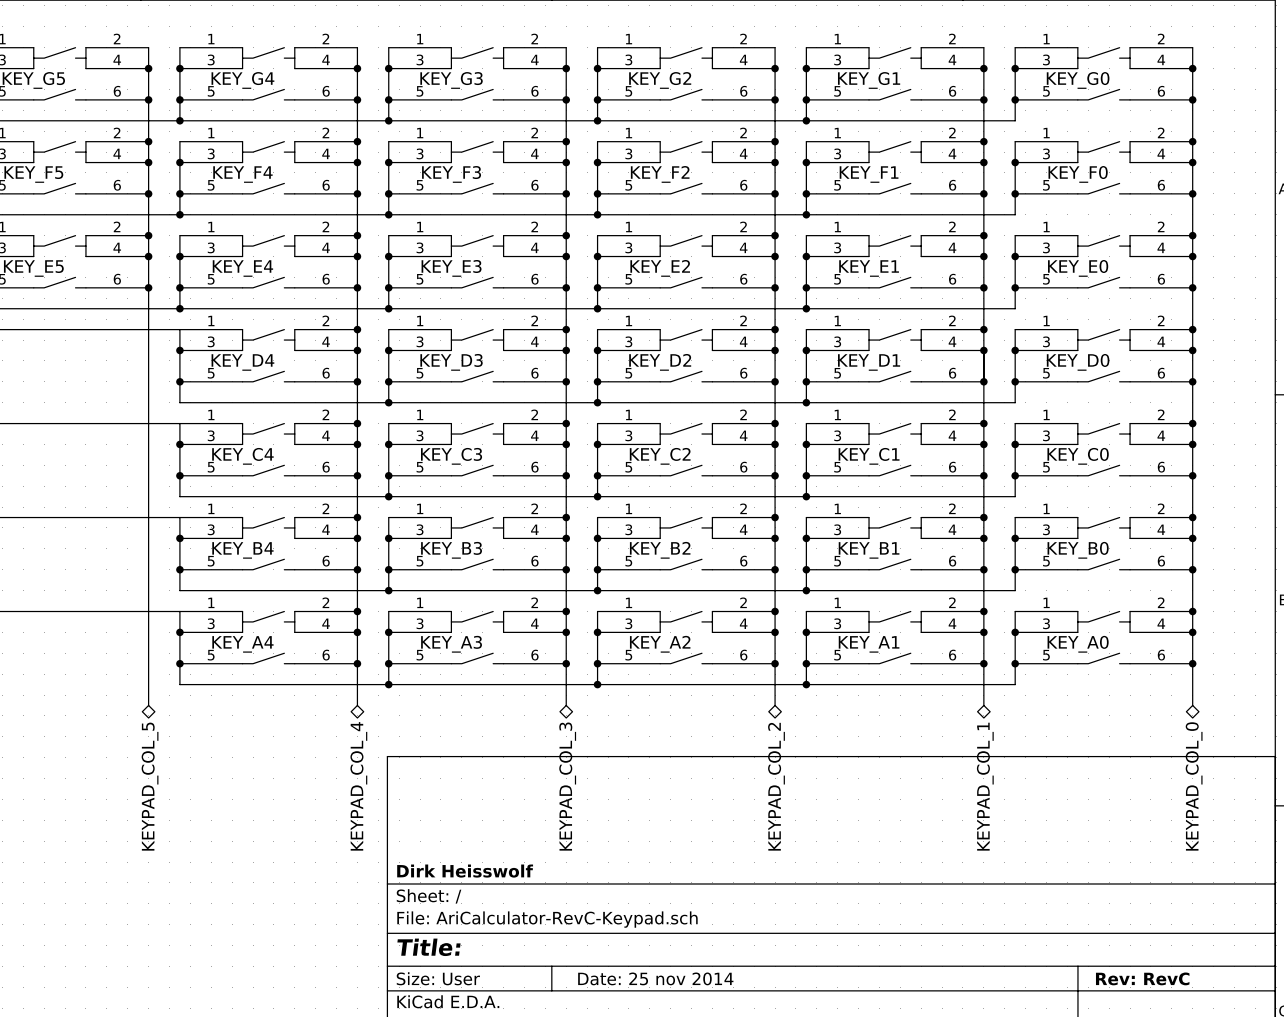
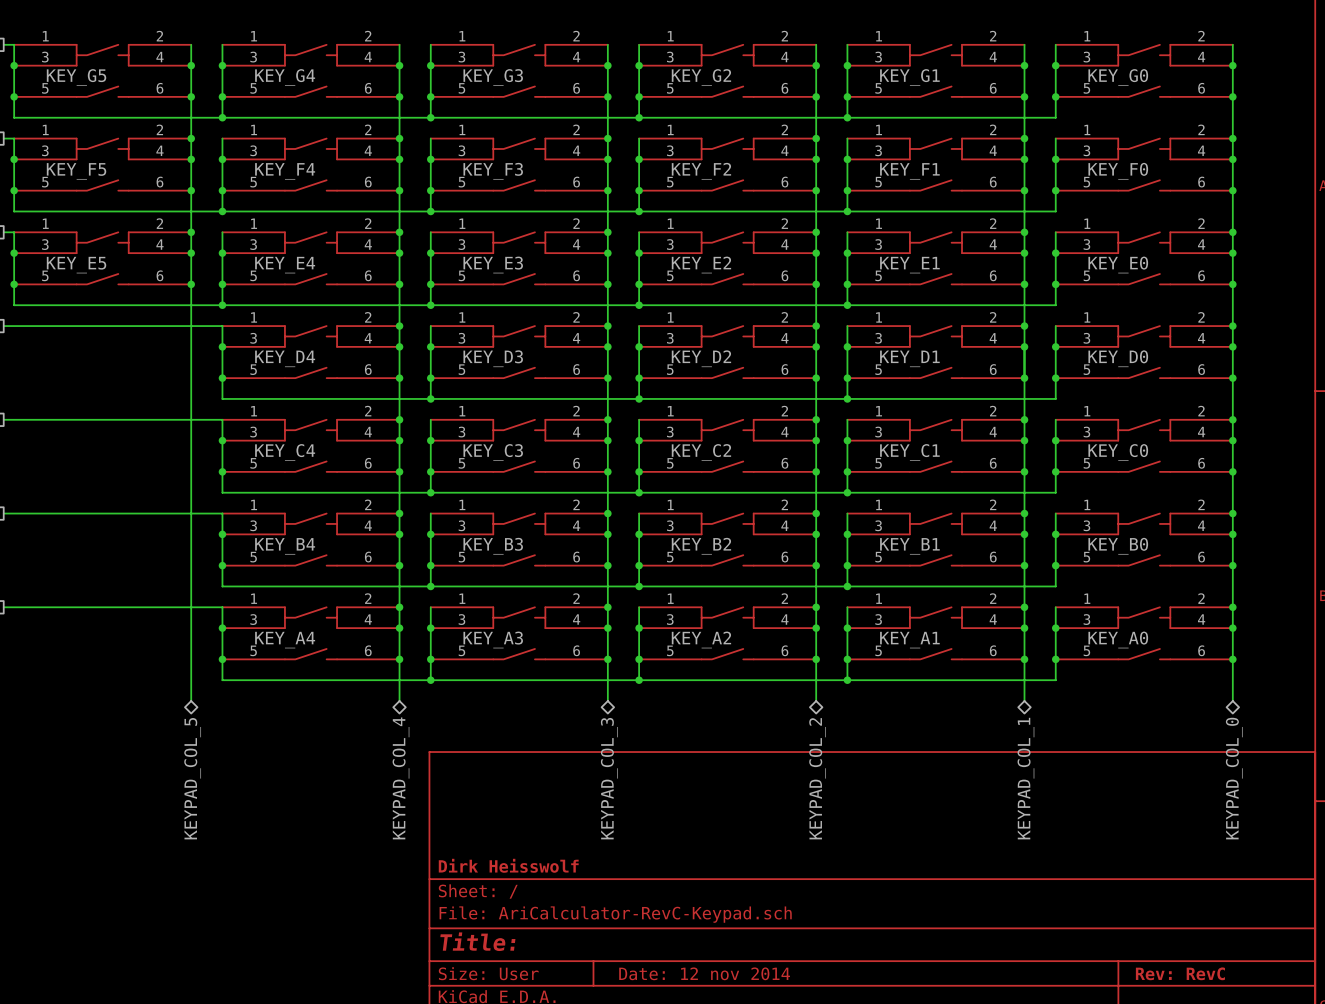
title block: Date: 25 nov 2014 (655, 978) -> Date: 12 nov 2014 (704, 973)

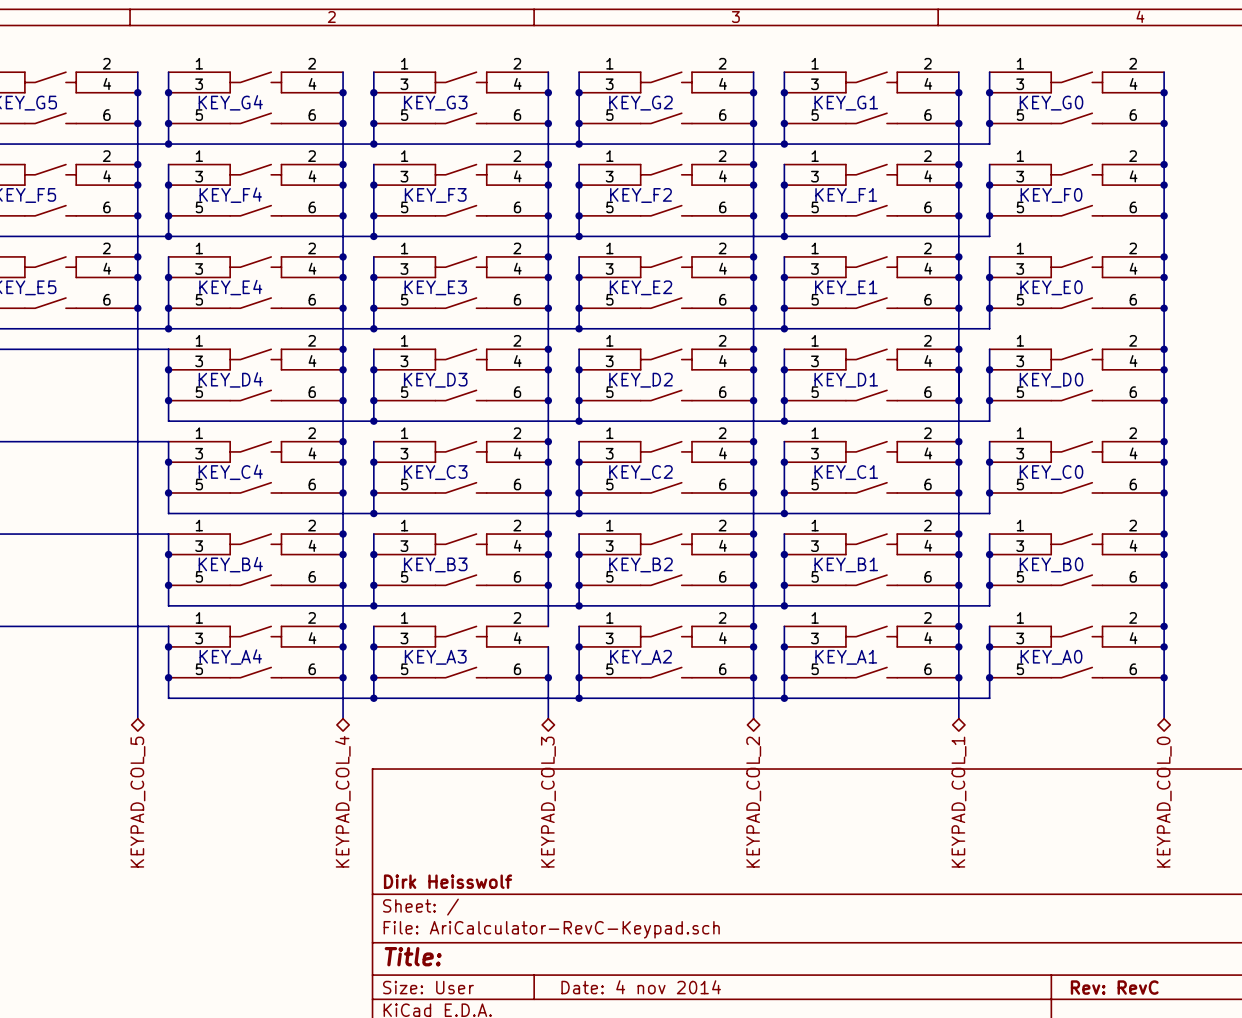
wire: (607, 607) (607, 628) -> none
junction: (607, 607) -> none
junction: (607, 628) -> none
title block: Date: 12 nov 2014 (704, 973) -> Date: 4 nov 2014 (641, 987)

